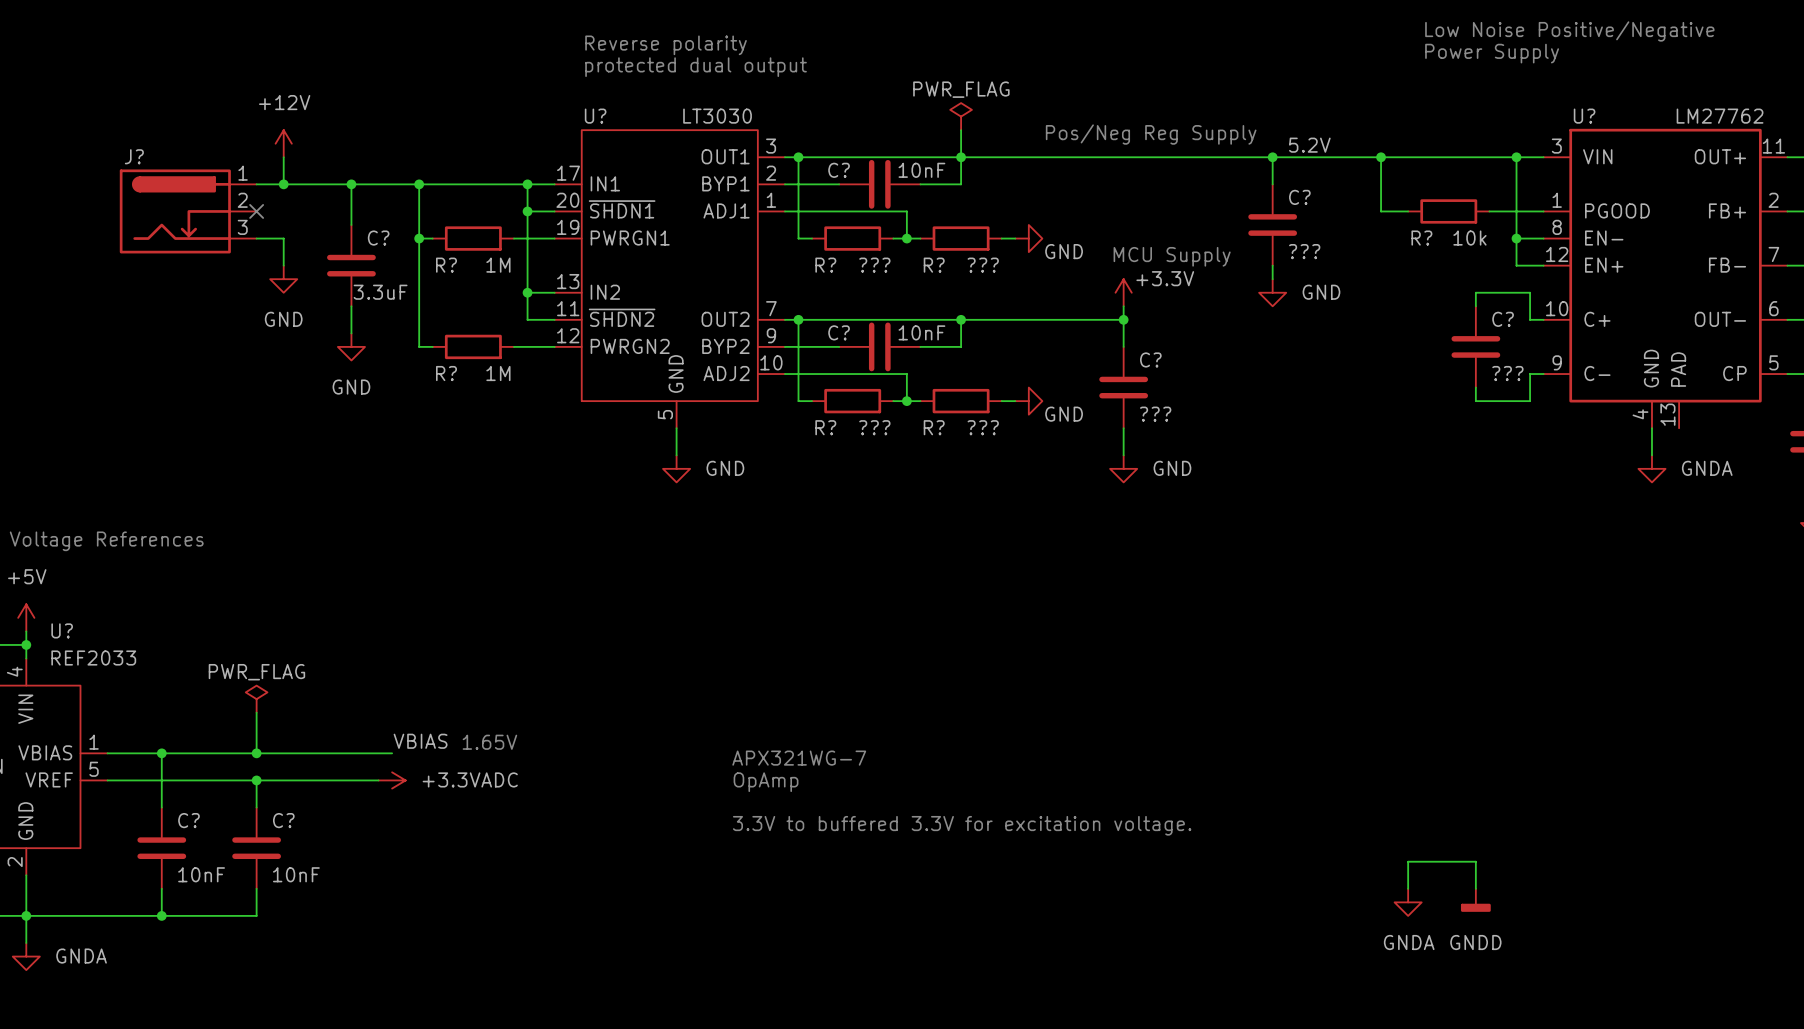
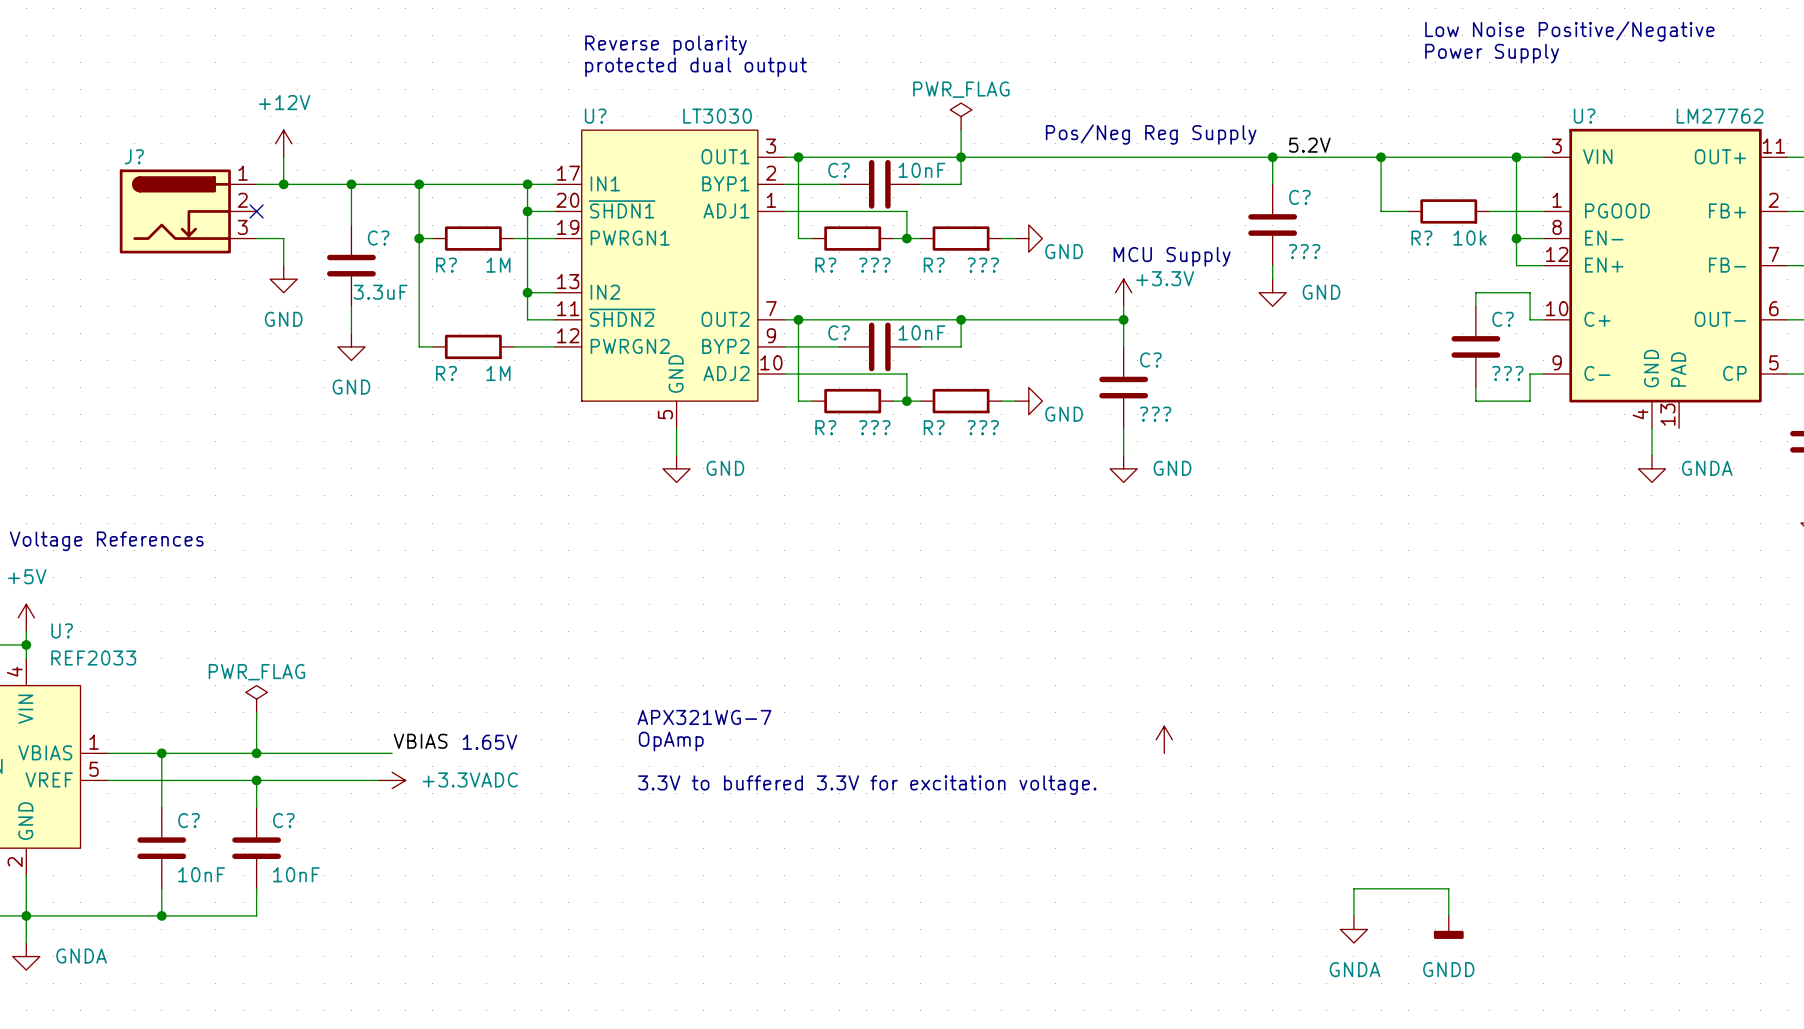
power symbol: none -> (1164, 739)
text position: APX321WG-7 (799, 758) -> APX321WG-7 (704, 717)
text position: OpAmp (766, 782) -> OpAmp (671, 741)
text position: 3.3V to buffered 3.3V for excitation voltage. (962, 825) -> 3.3V to buffered 3.3V for excitation voltage. (867, 785)
wire: (1408, 888) (1408, 861) (1475, 861) (1475, 888) -> none
power symbol position: GNDD (1475, 900) -> GNDD (1448, 927)
power symbol position: GNDA (1408, 902) -> GNDA (1353, 929)
wire: none -> (1353, 915) (1353, 888) (1448, 888) (1448, 915)

